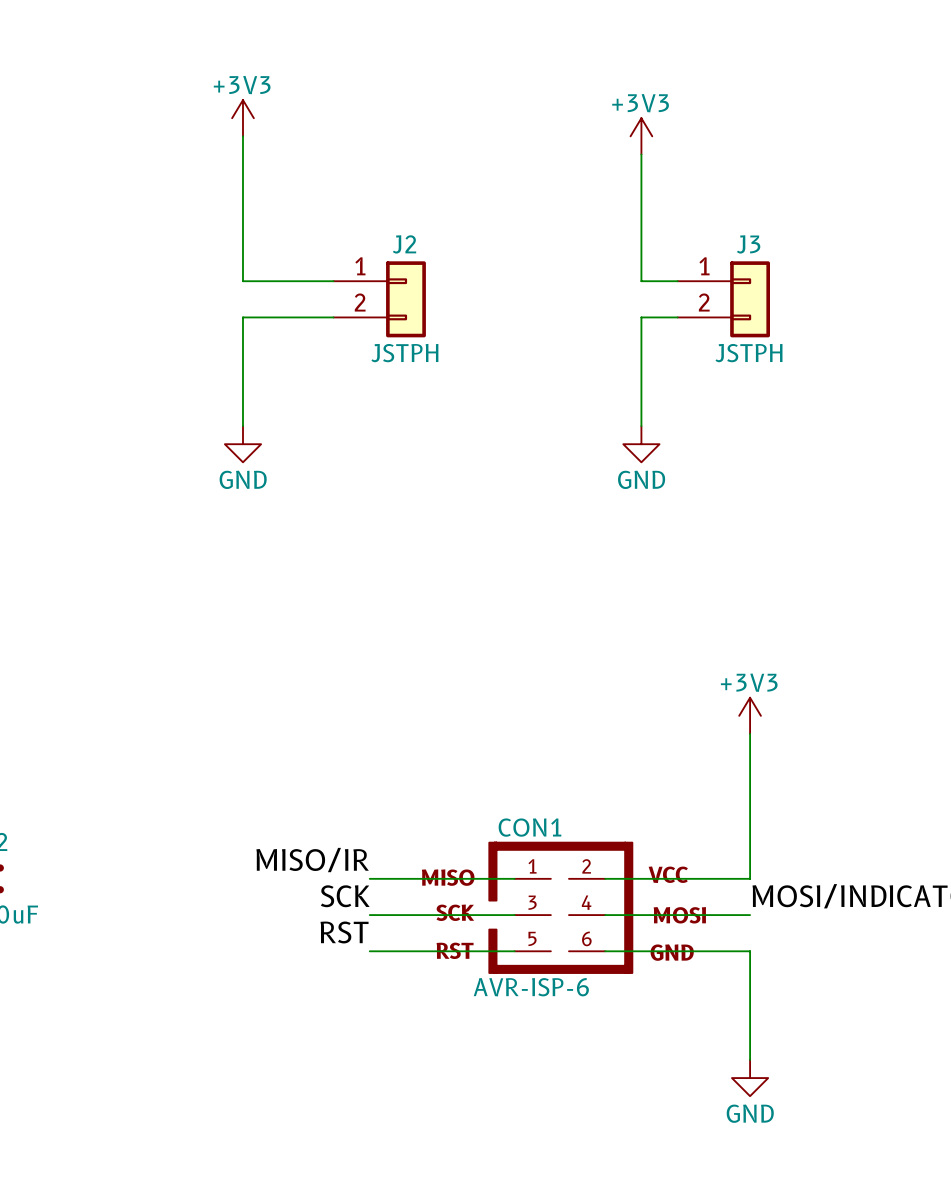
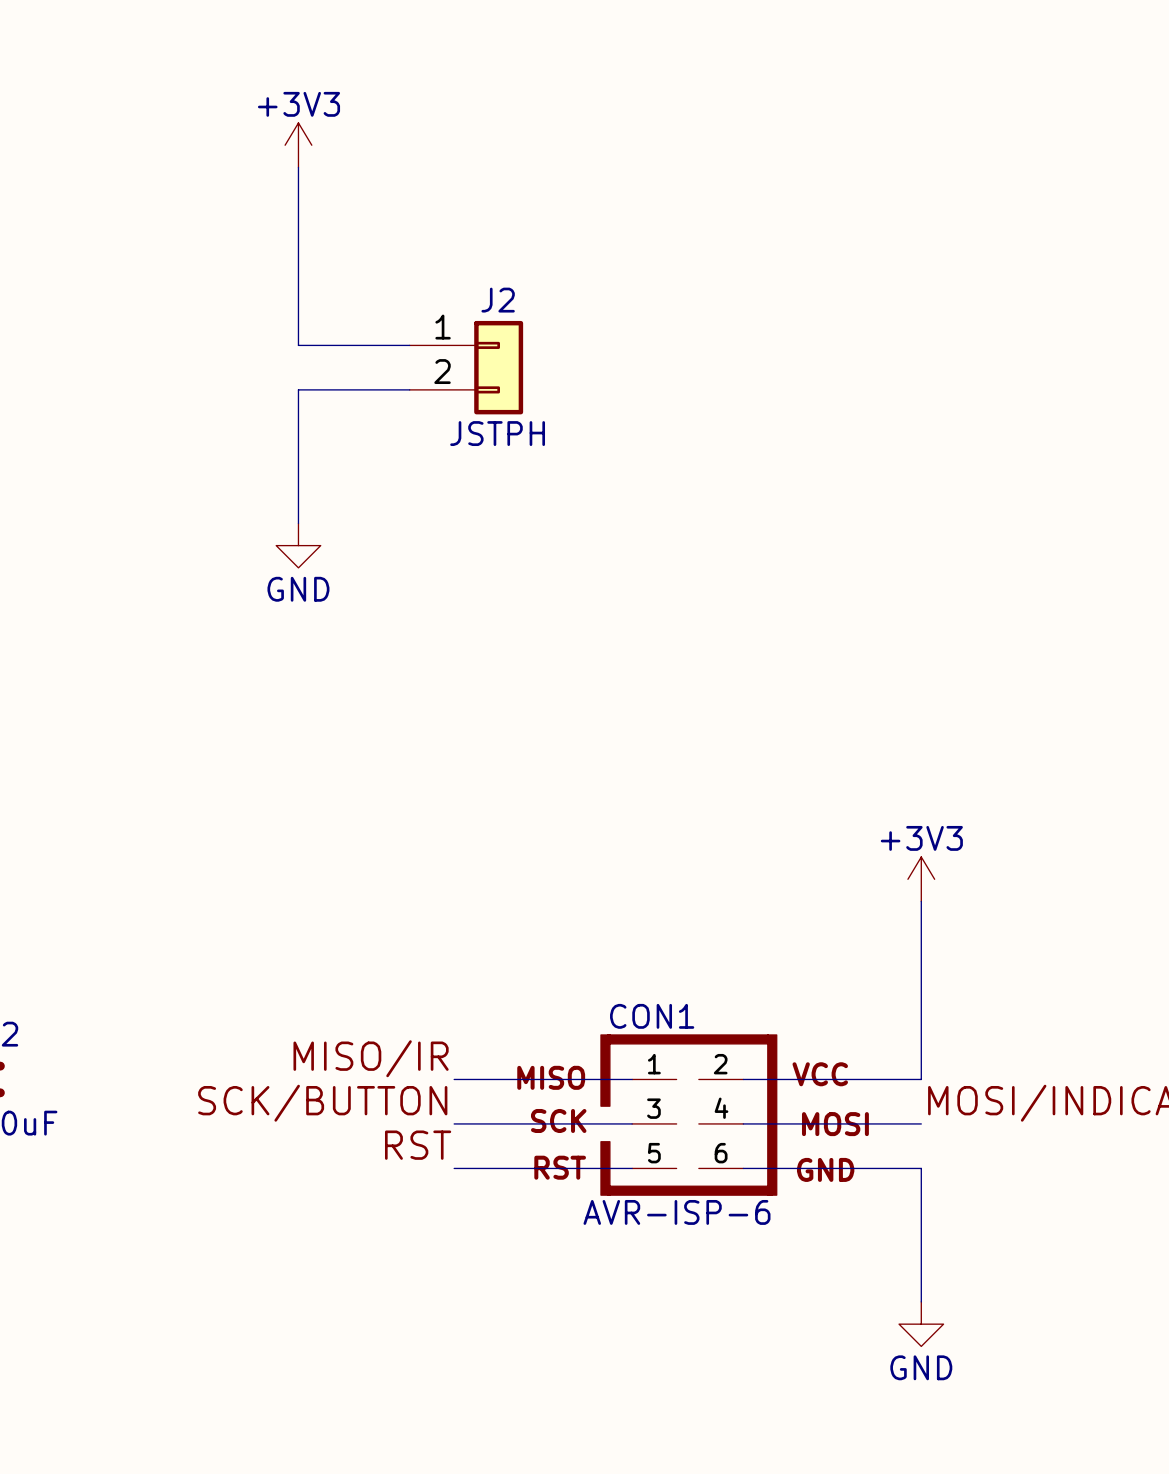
power symbol: +3V3 (641, 136) -> none
wire: (641, 154) (641, 281) (677, 281) -> none
J3: JSTPH (723, 299) -> none
wire: (677, 317) (641, 317) (641, 426) -> none
power symbol: GND (641, 444) -> none
label: SCK (345, 896) -> SCK/BUTTON (322, 1103)

